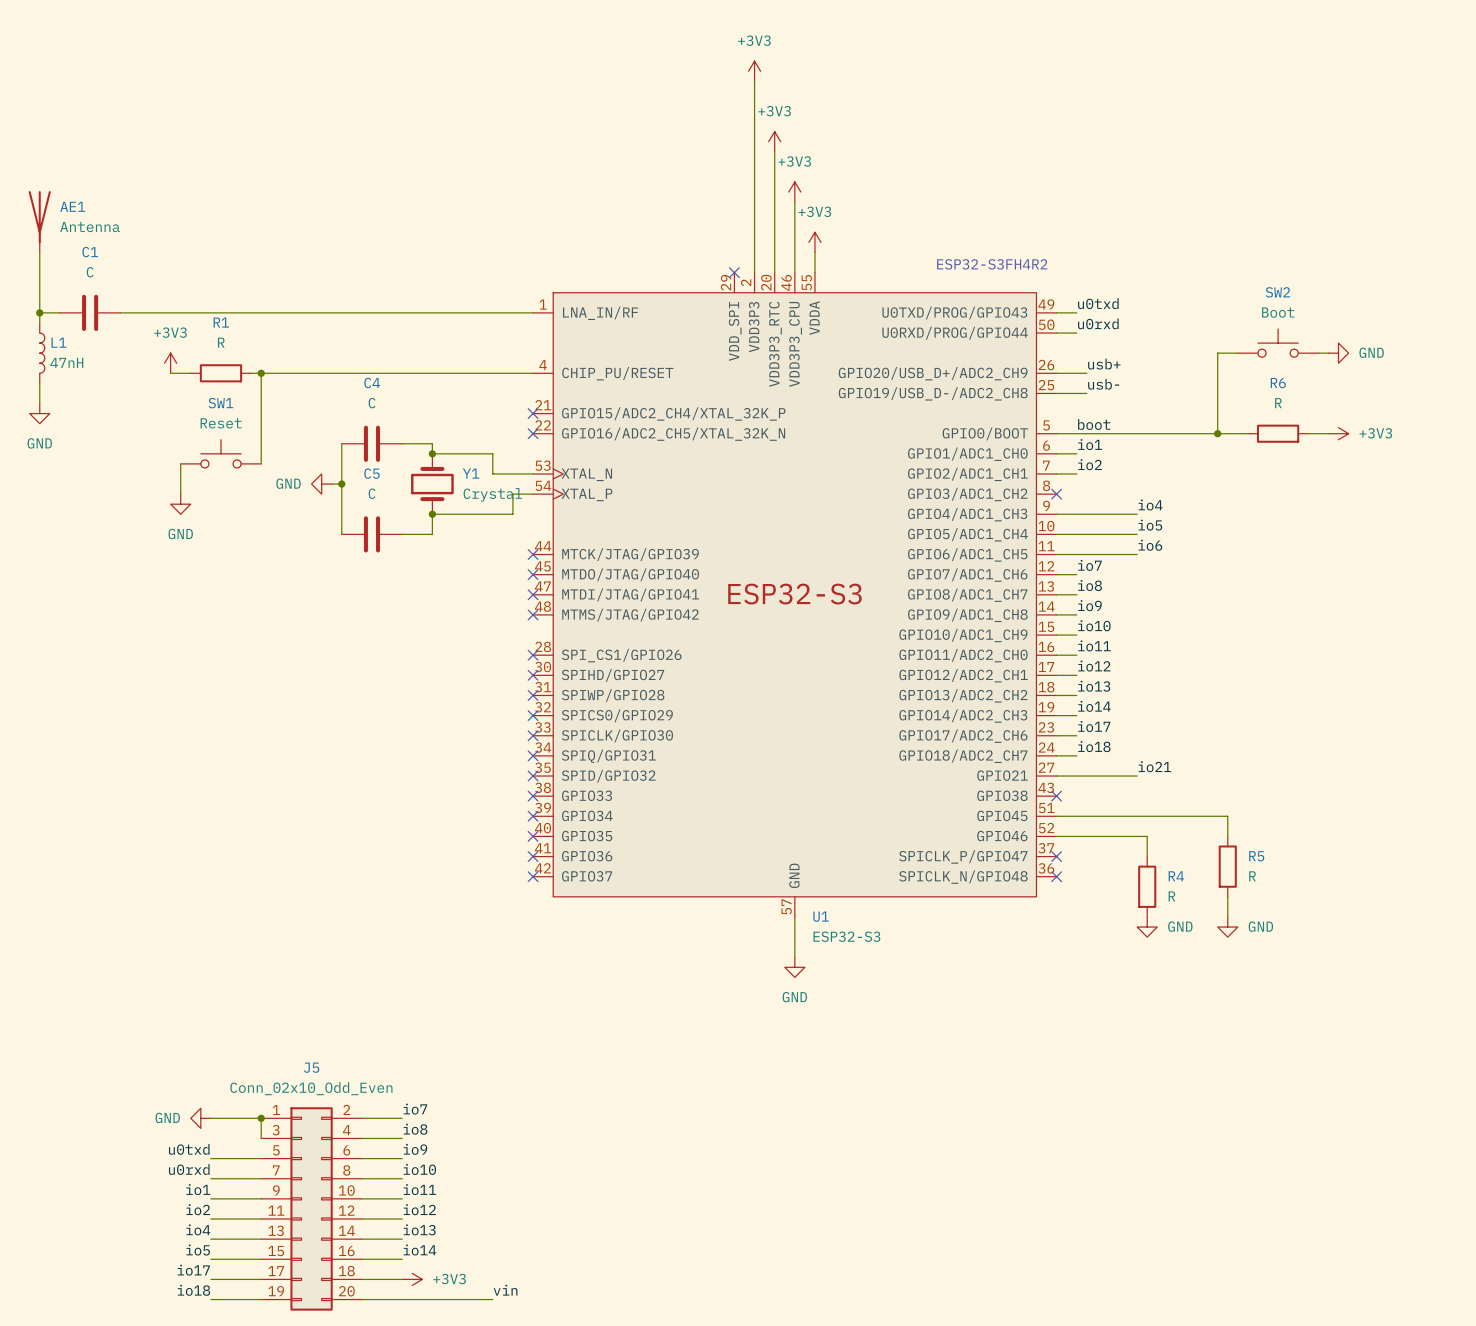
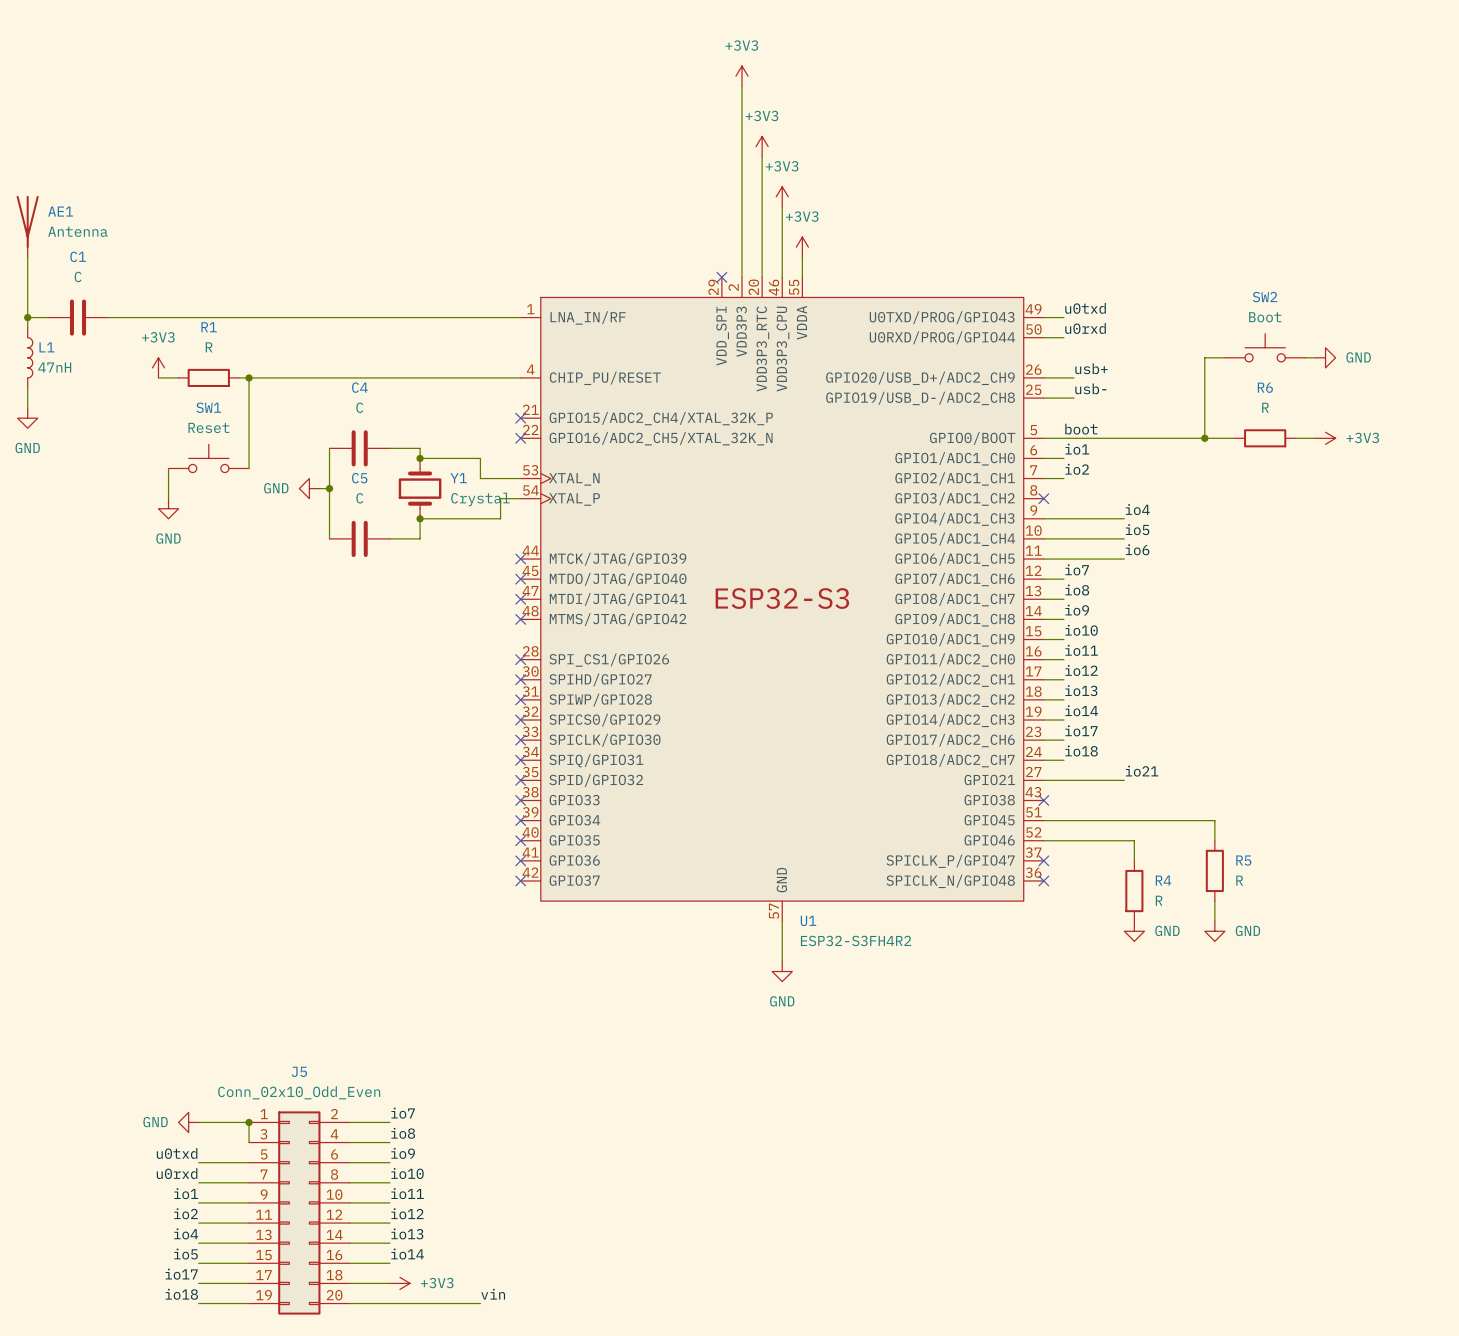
text: ESP32-S3FH4R2 (992, 264) -> none
U1 value: ESP32-S3 (846, 936) -> ESP32-S3FH4R2 (856, 940)

